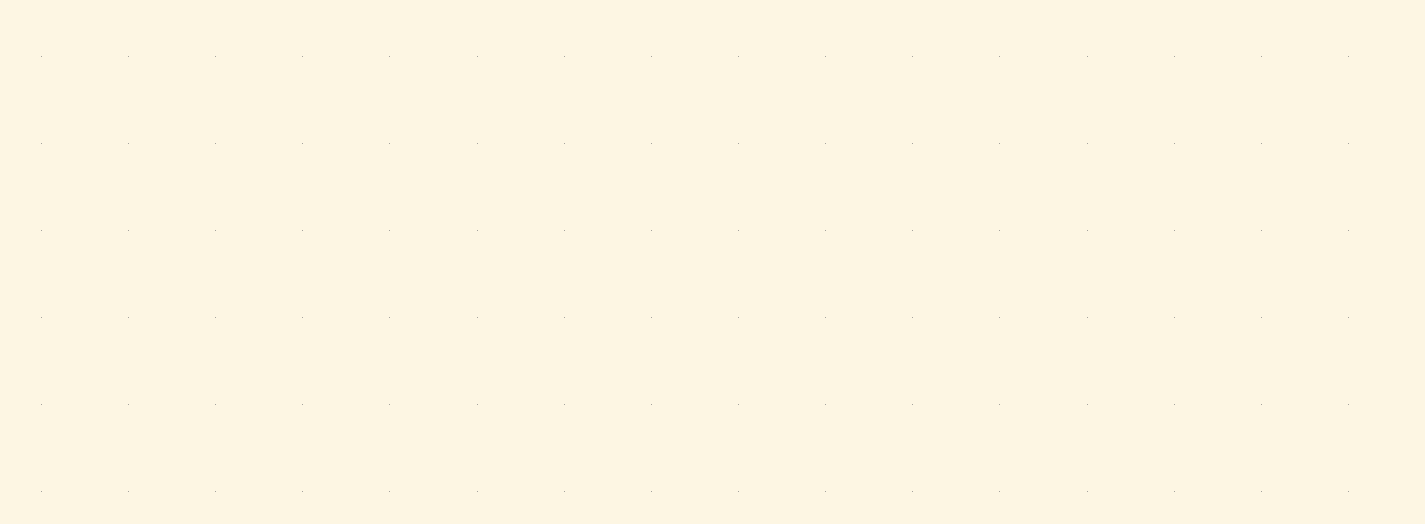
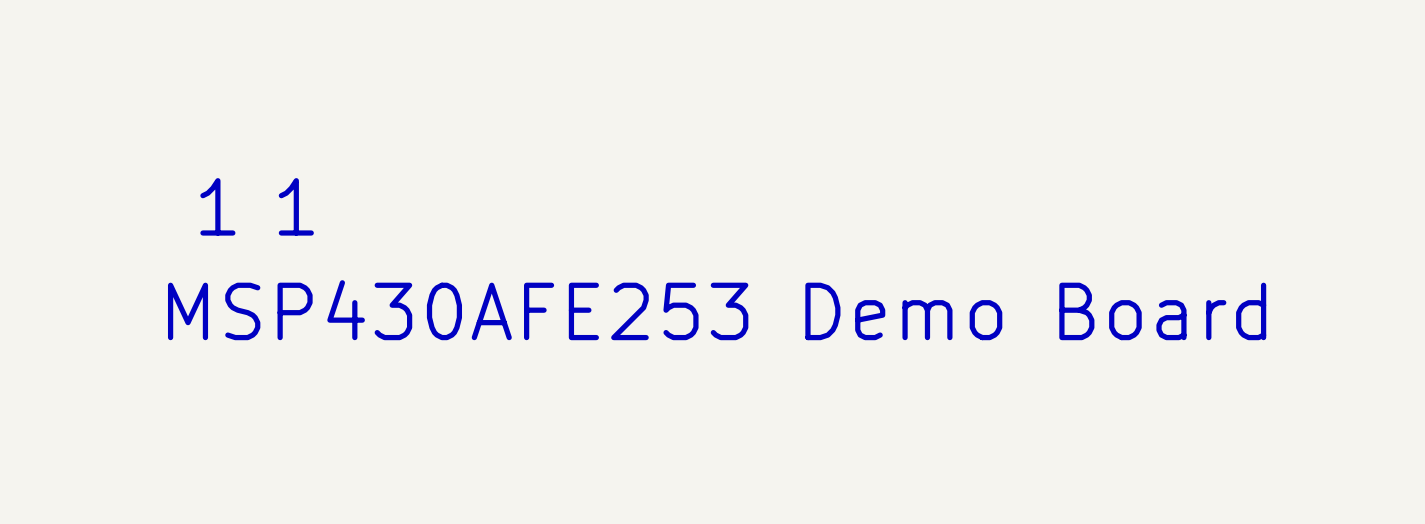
text: none -> 1 (217, 206)
text: none -> 1 (296, 206)
text: none -> MSP430AFE253 Demo Board (717, 310)

